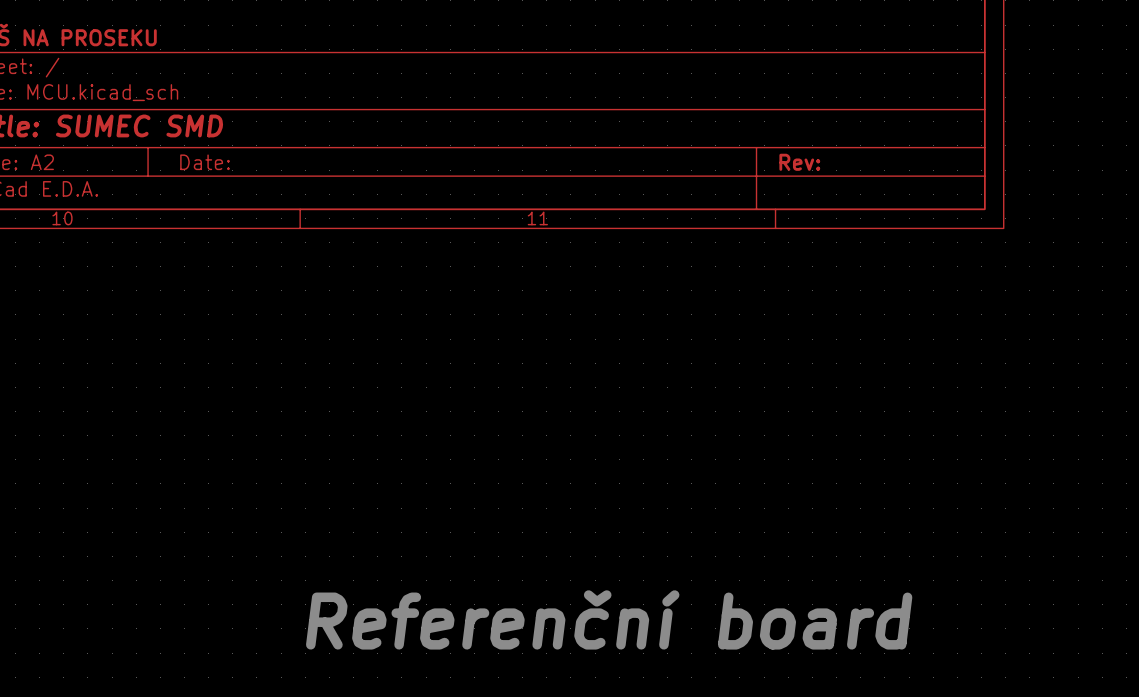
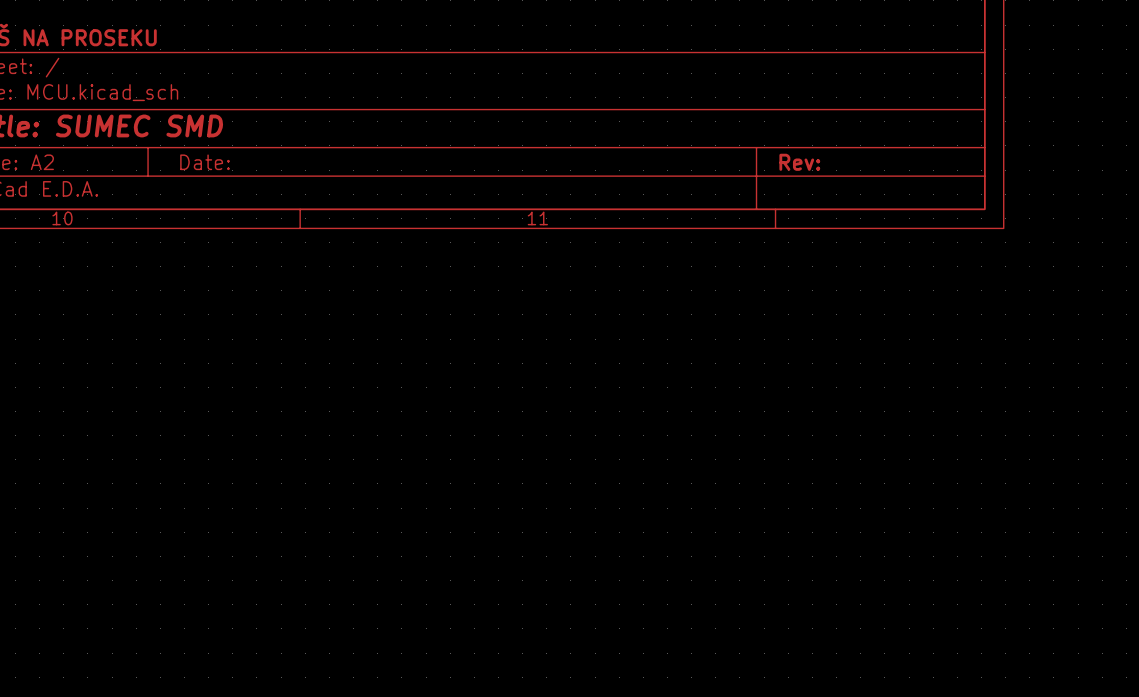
text: Referenční board (609, 619) -> none

